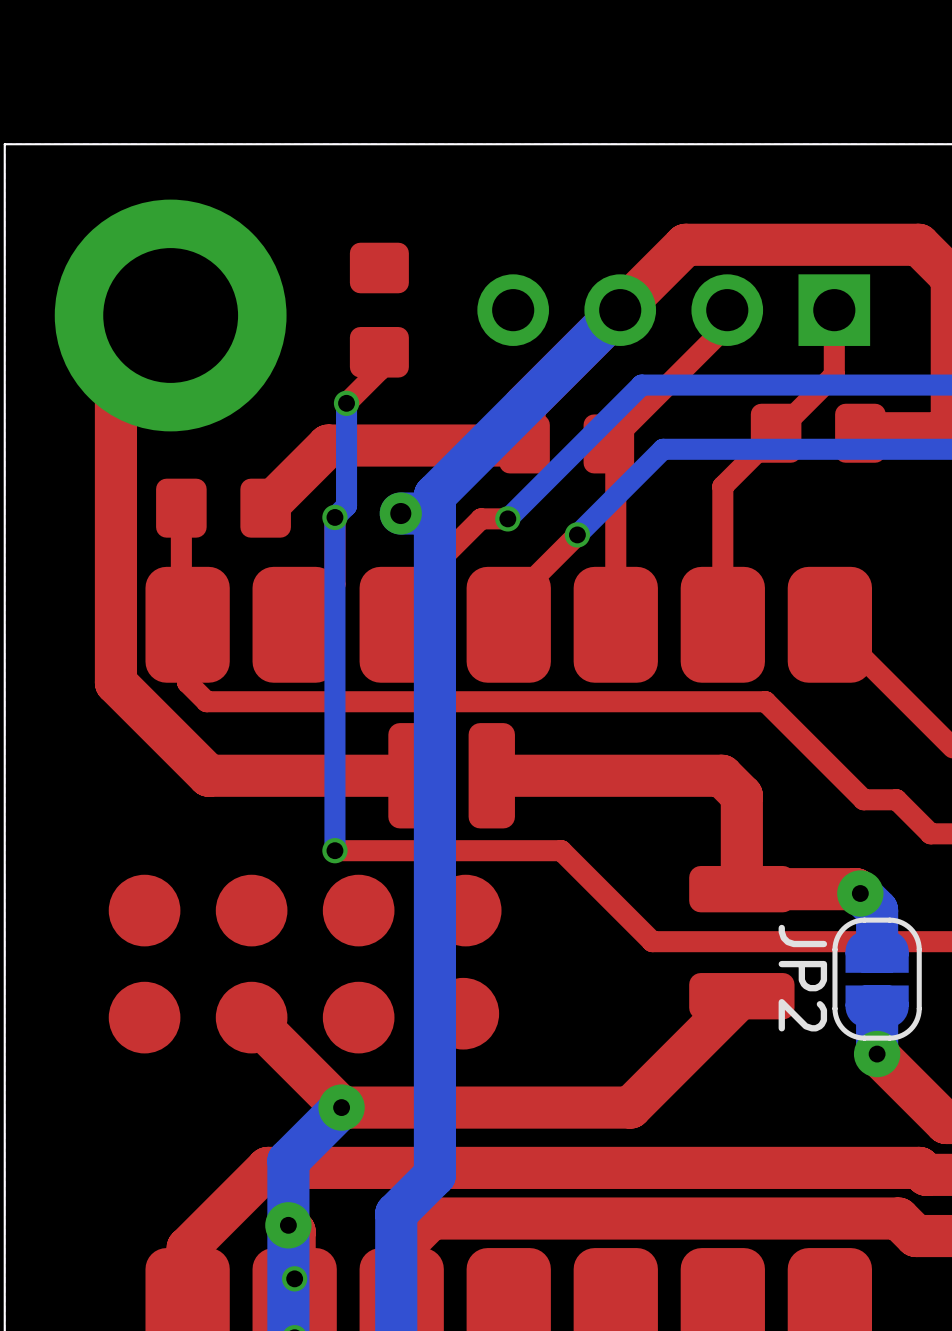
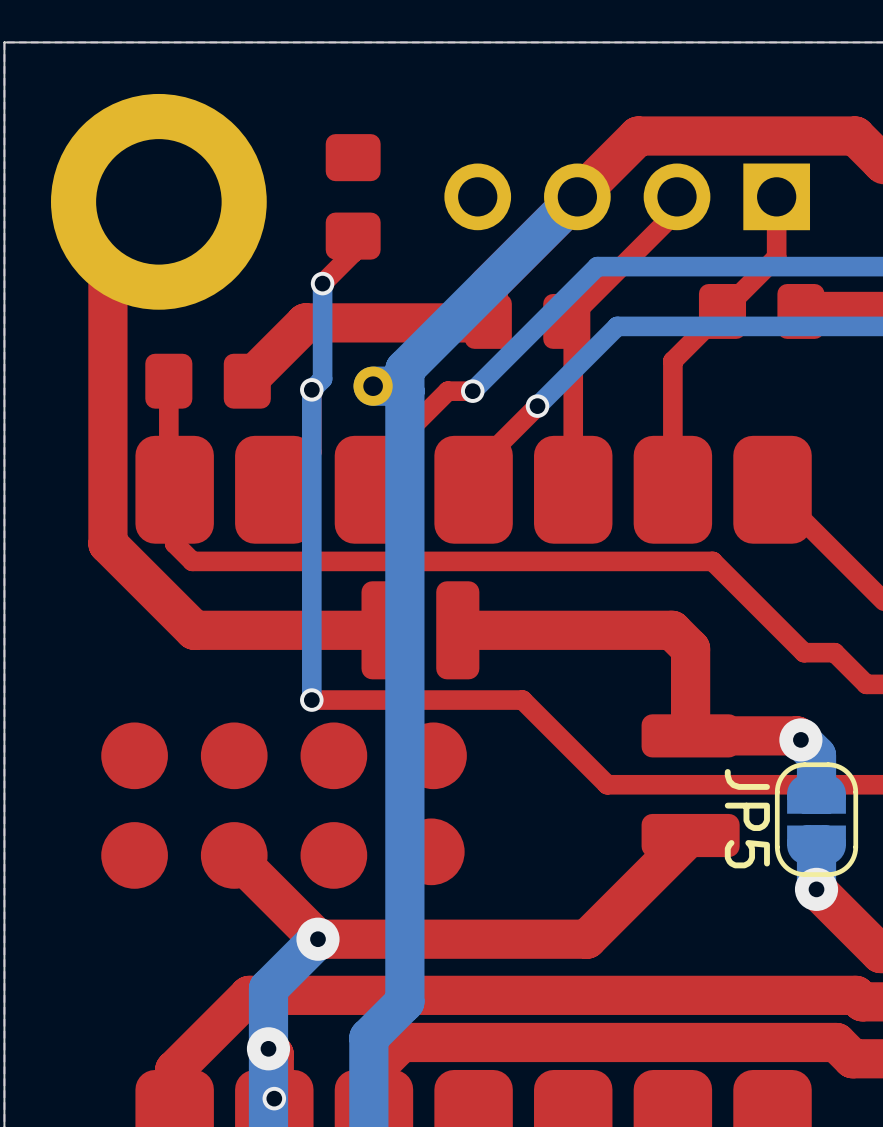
JP2 name: JP2 (802, 978) -> JP5 (747, 818)

